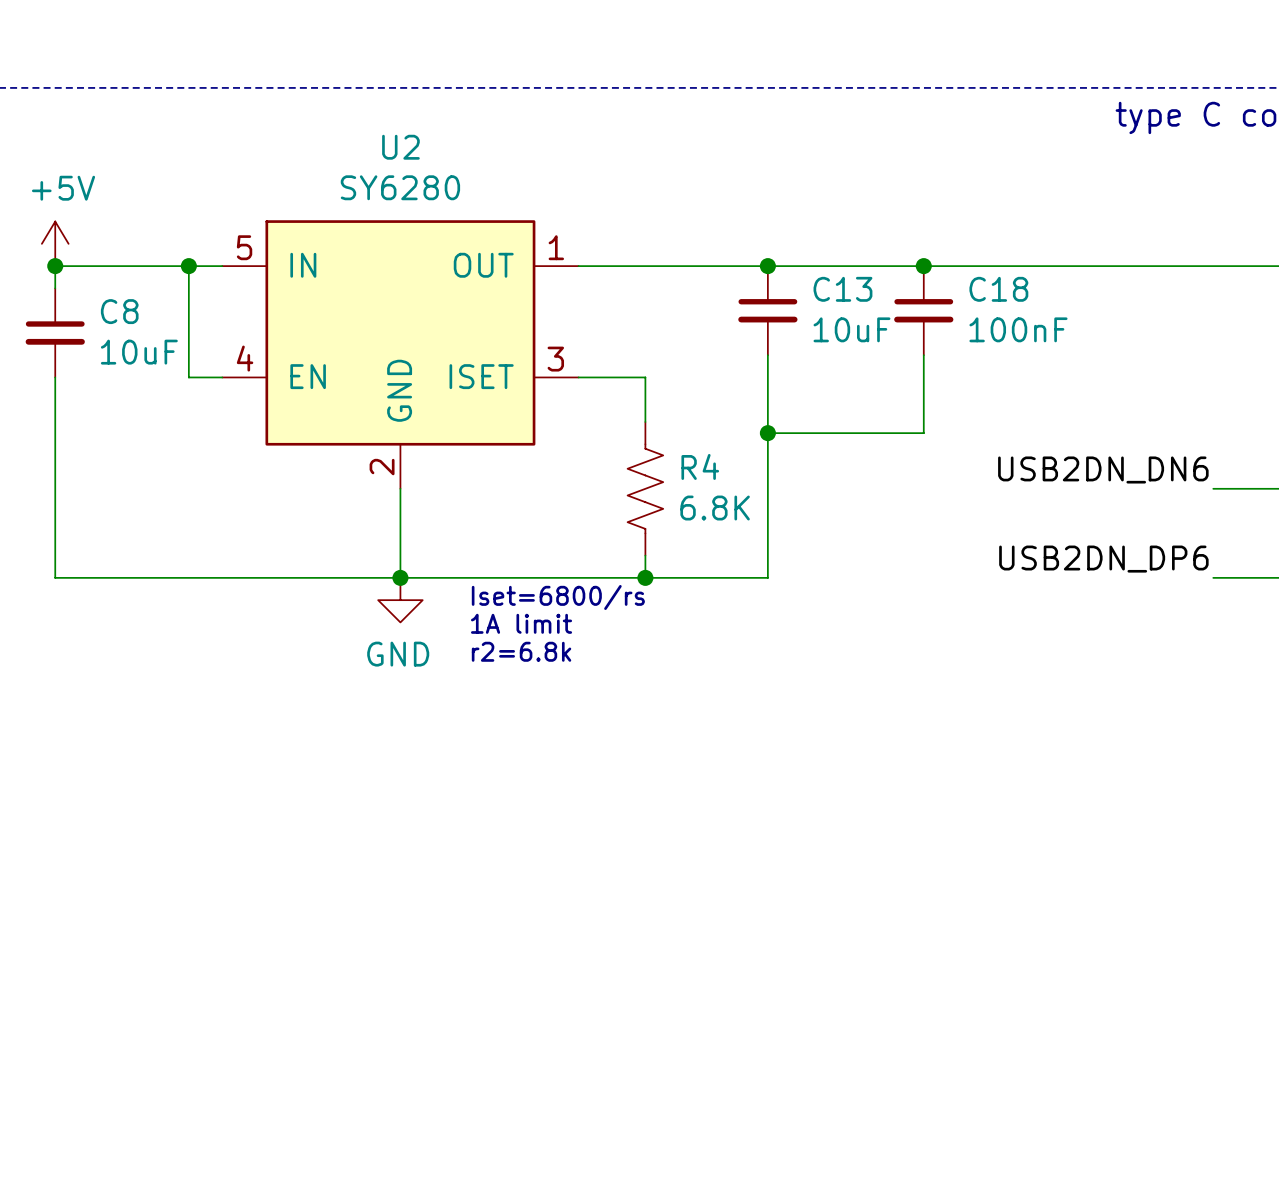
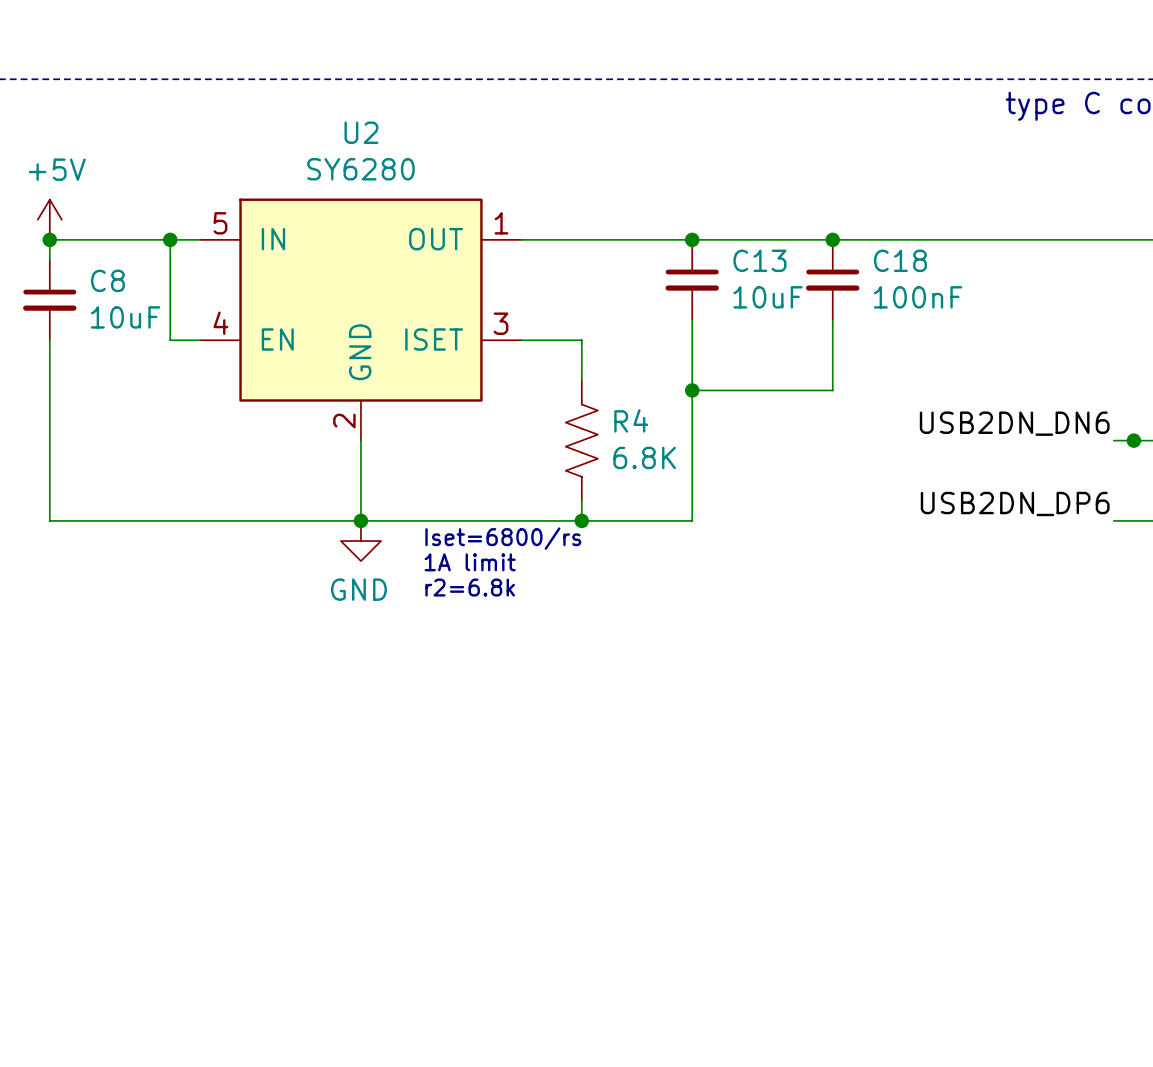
label position: USB2DN_DN6 (1103, 469) -> USB2DN_DN6 (1014, 423)
wire: (1213, 488) (1235, 488) -> none
junction: none -> (1133, 440)
label position: USB2DN_DP6 (1103, 559) -> USB2DN_DP6 (1015, 503)
wire: (1213, 577) (1235, 577) -> none

